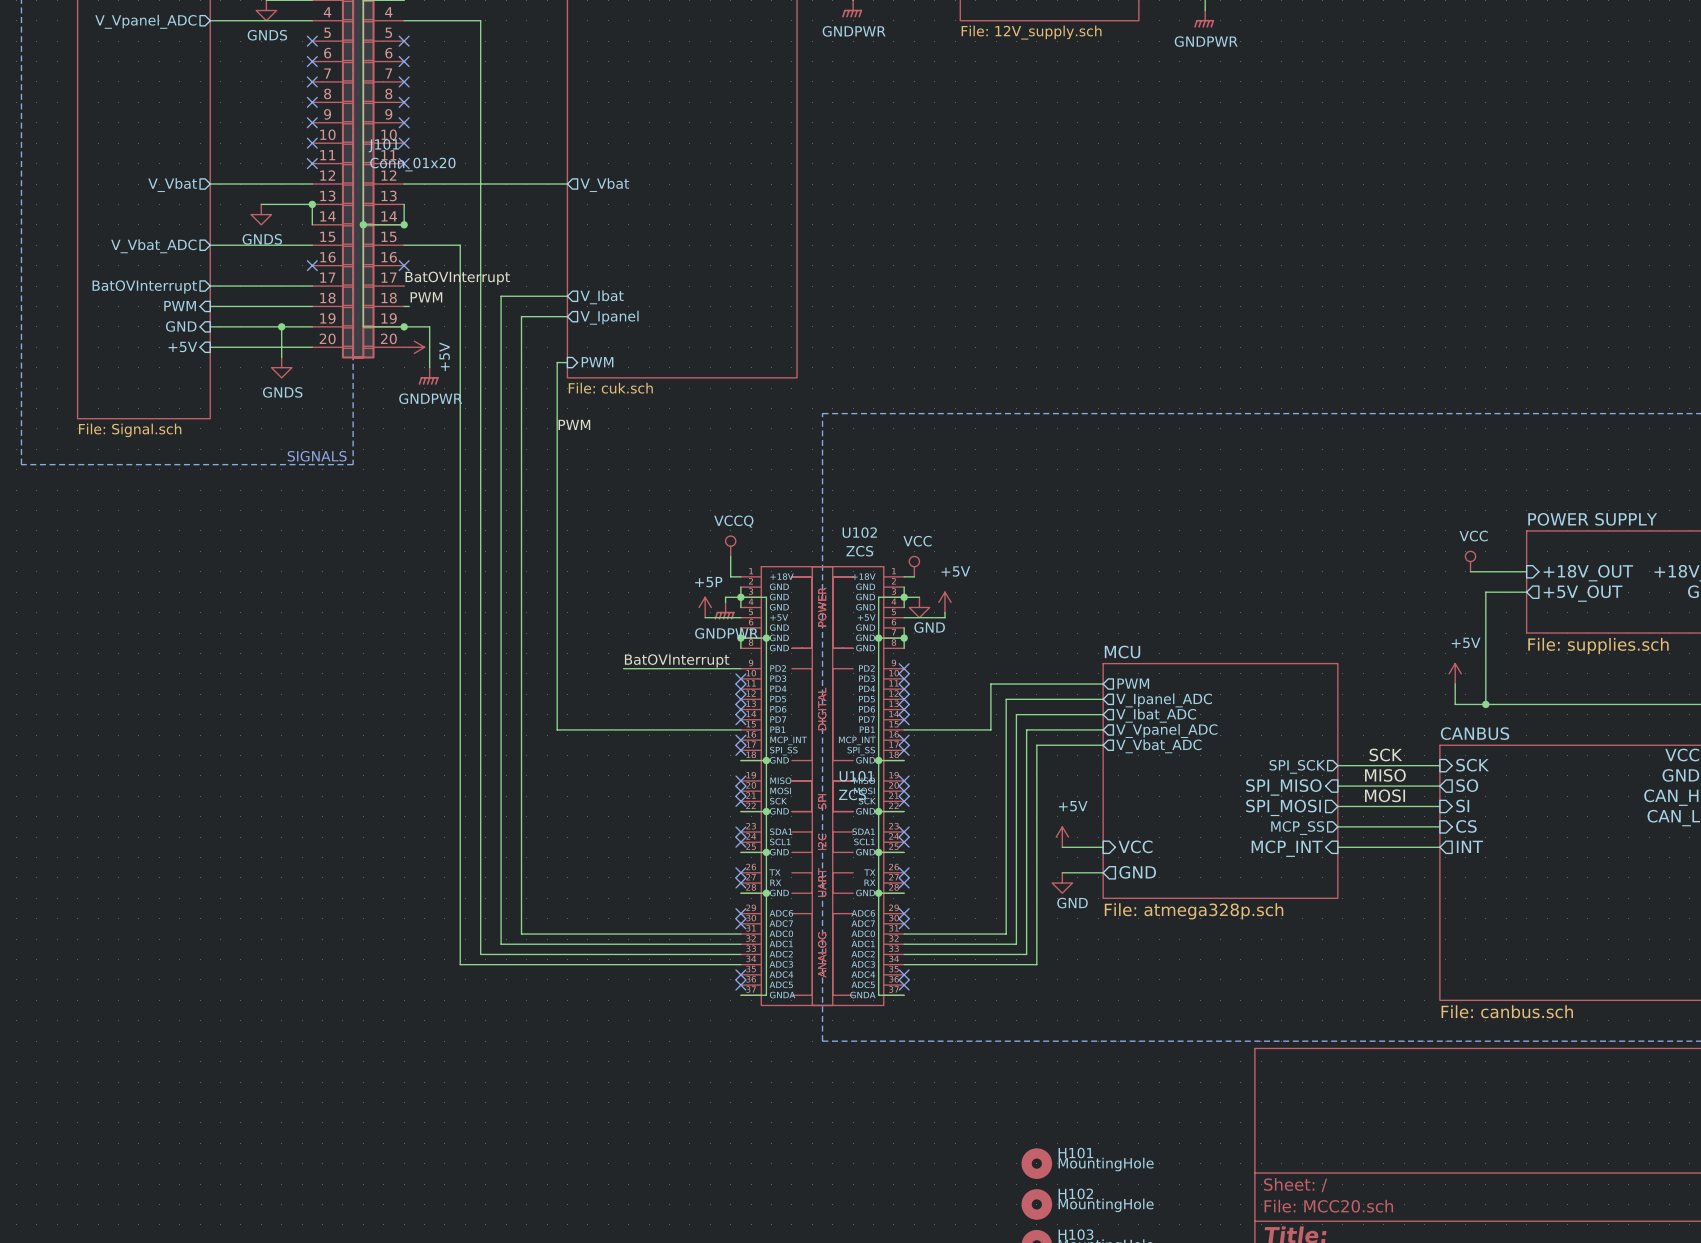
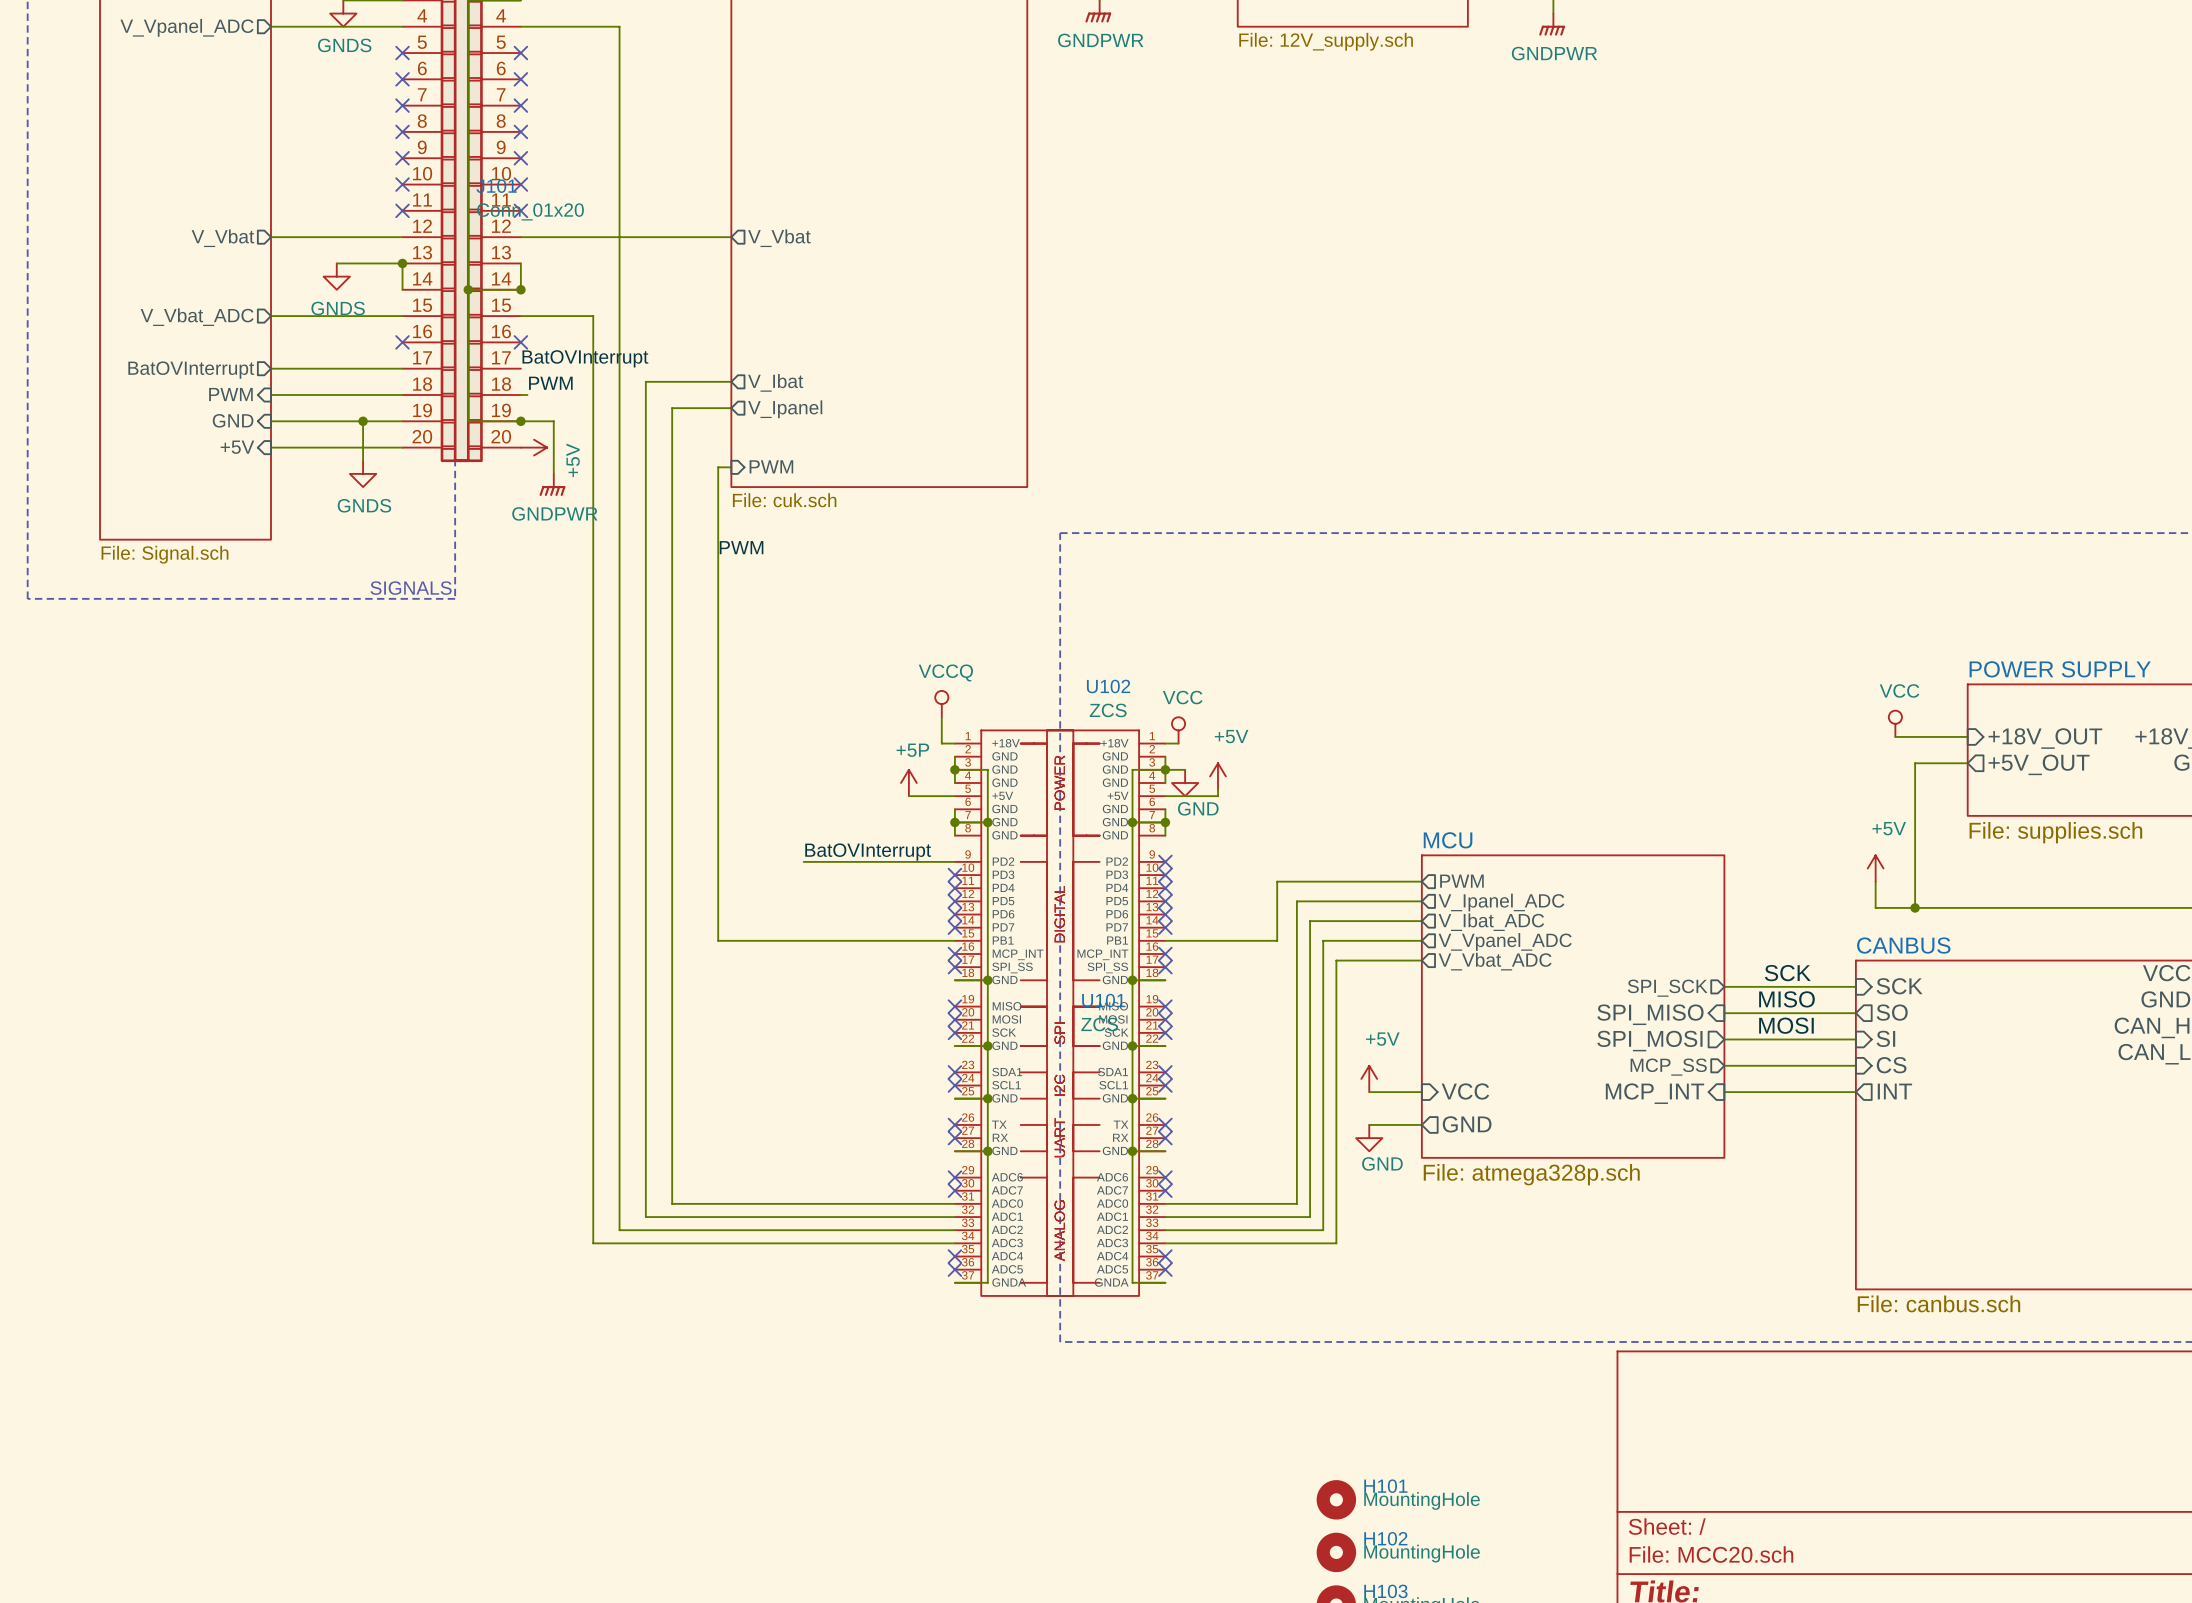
wire: (740, 597) (725, 597) (725, 602) -> none
power symbol: GNDPWR (724, 610) -> none

